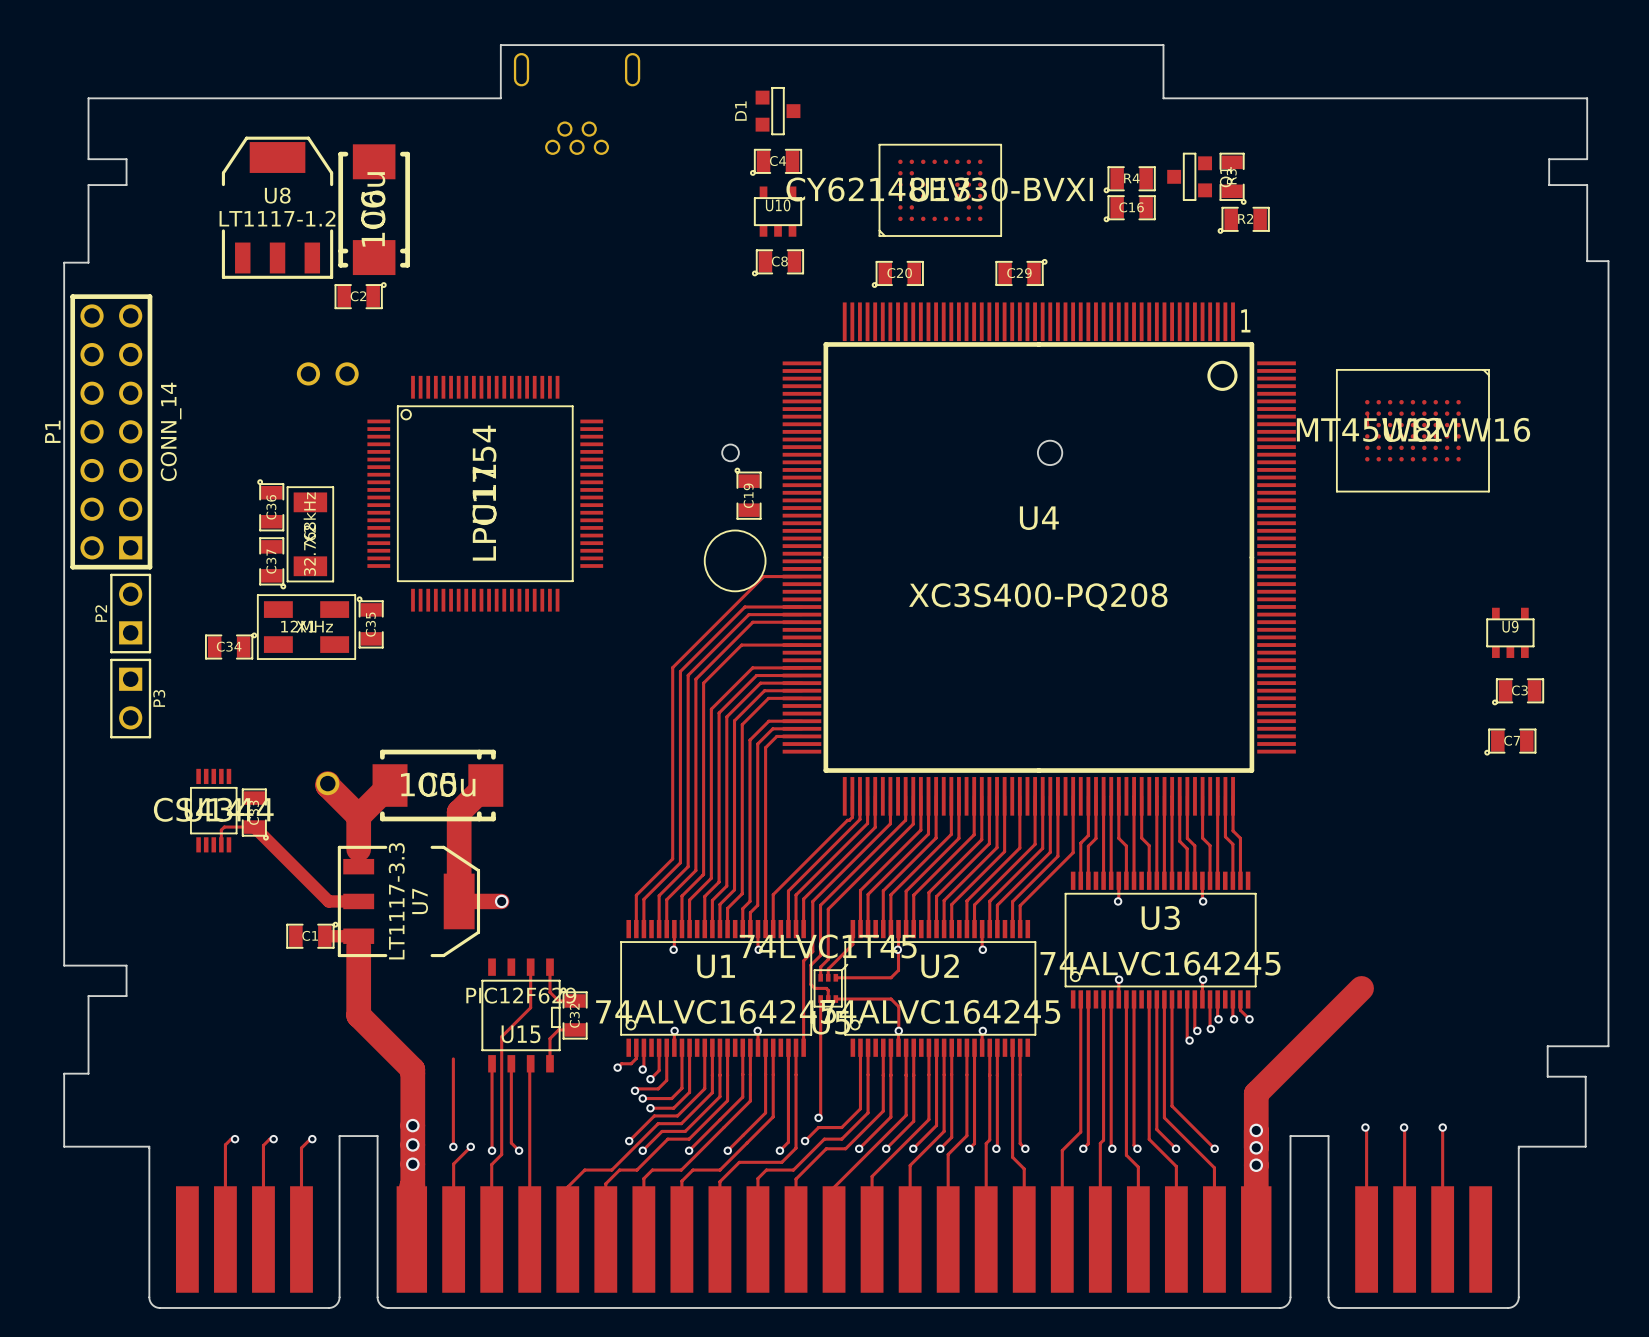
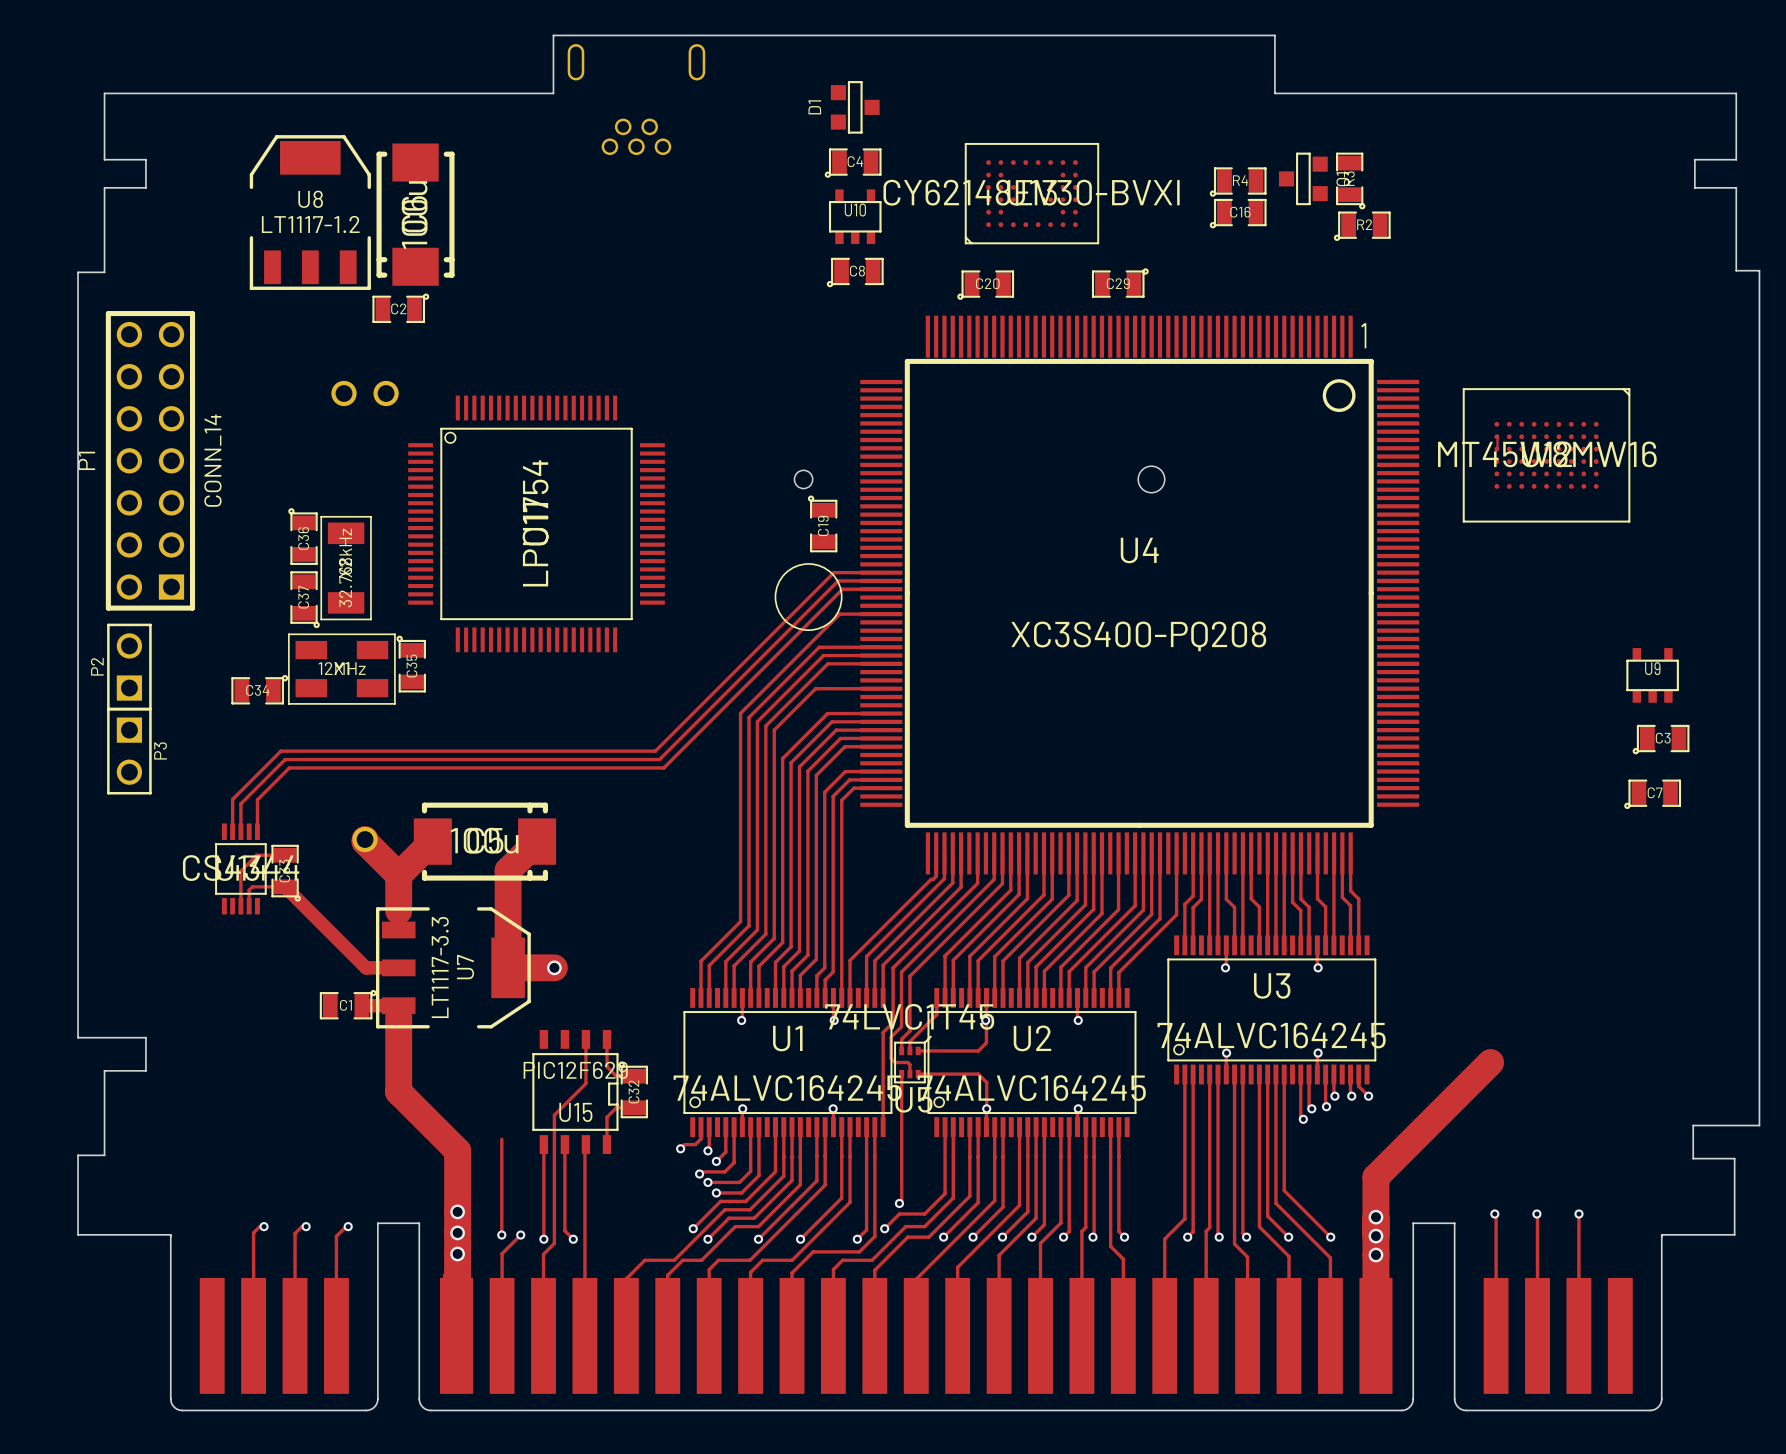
P1 position: (111, 431) -> (150, 460)
track: none -> (881, 572) (833, 572) (655, 751) (280, 751) (232, 799) (232, 831)
track: none -> (881, 580) (838, 580) (659, 759) (285, 759) (240, 803) (240, 831)
track: none -> (881, 589) (842, 589) (663, 767) (289, 767) (257, 799) (257, 831)
P2 position: (130, 613) -> (129, 666)
P3 position: (130, 698) -> (129, 751)
track: none -> (285, 855) (256, 855) (240, 871) (240, 906)
track width: thin (459, 901) (501, 901) -> thick (508, 967) (554, 967)

